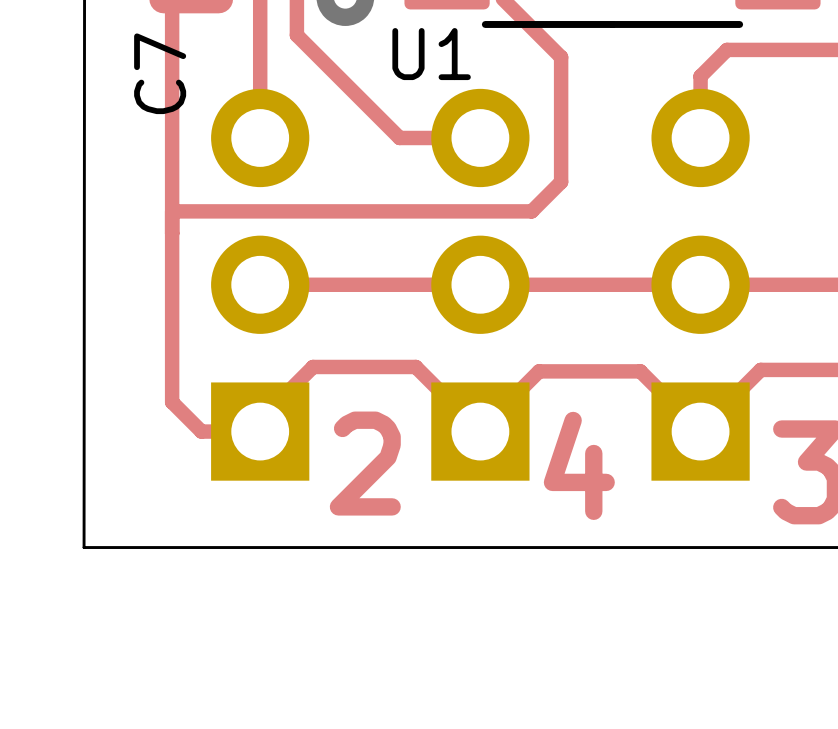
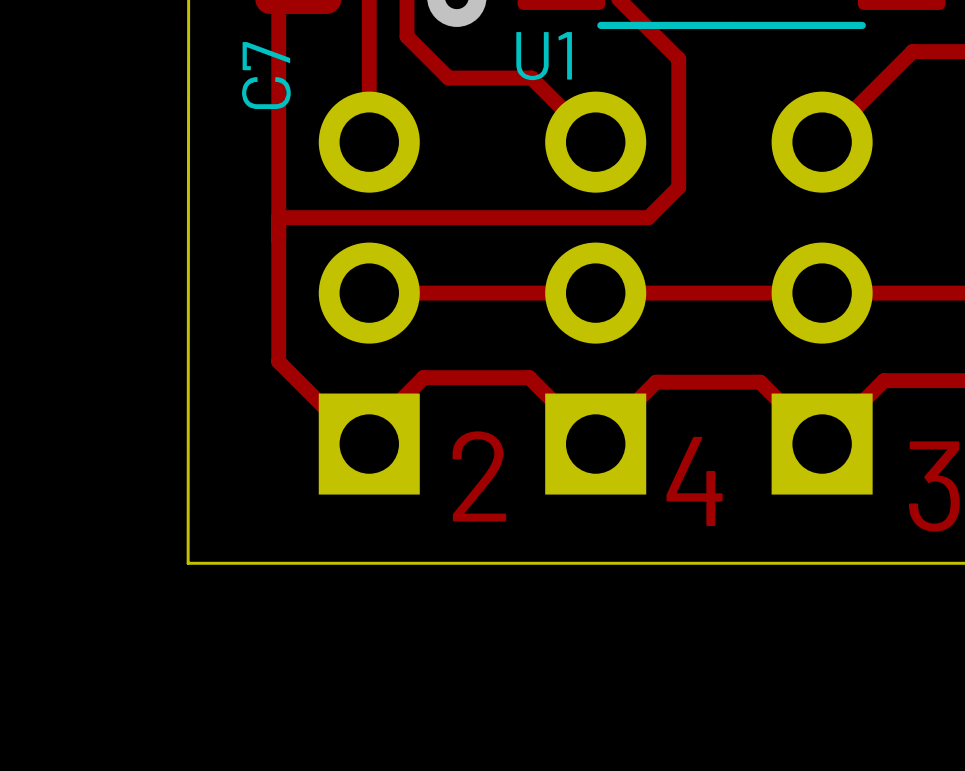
track: (788, 49) (726, 49) (700, 76) (700, 137) -> (912, 51) (822, 142)
track: (337, 75) (399, 137) (480, 137) -> (448, 77) (531, 77) (595, 142)
track: (172, 351) (172, 402) (201, 431) (252, 431) -> (278, 361) (360, 444)

